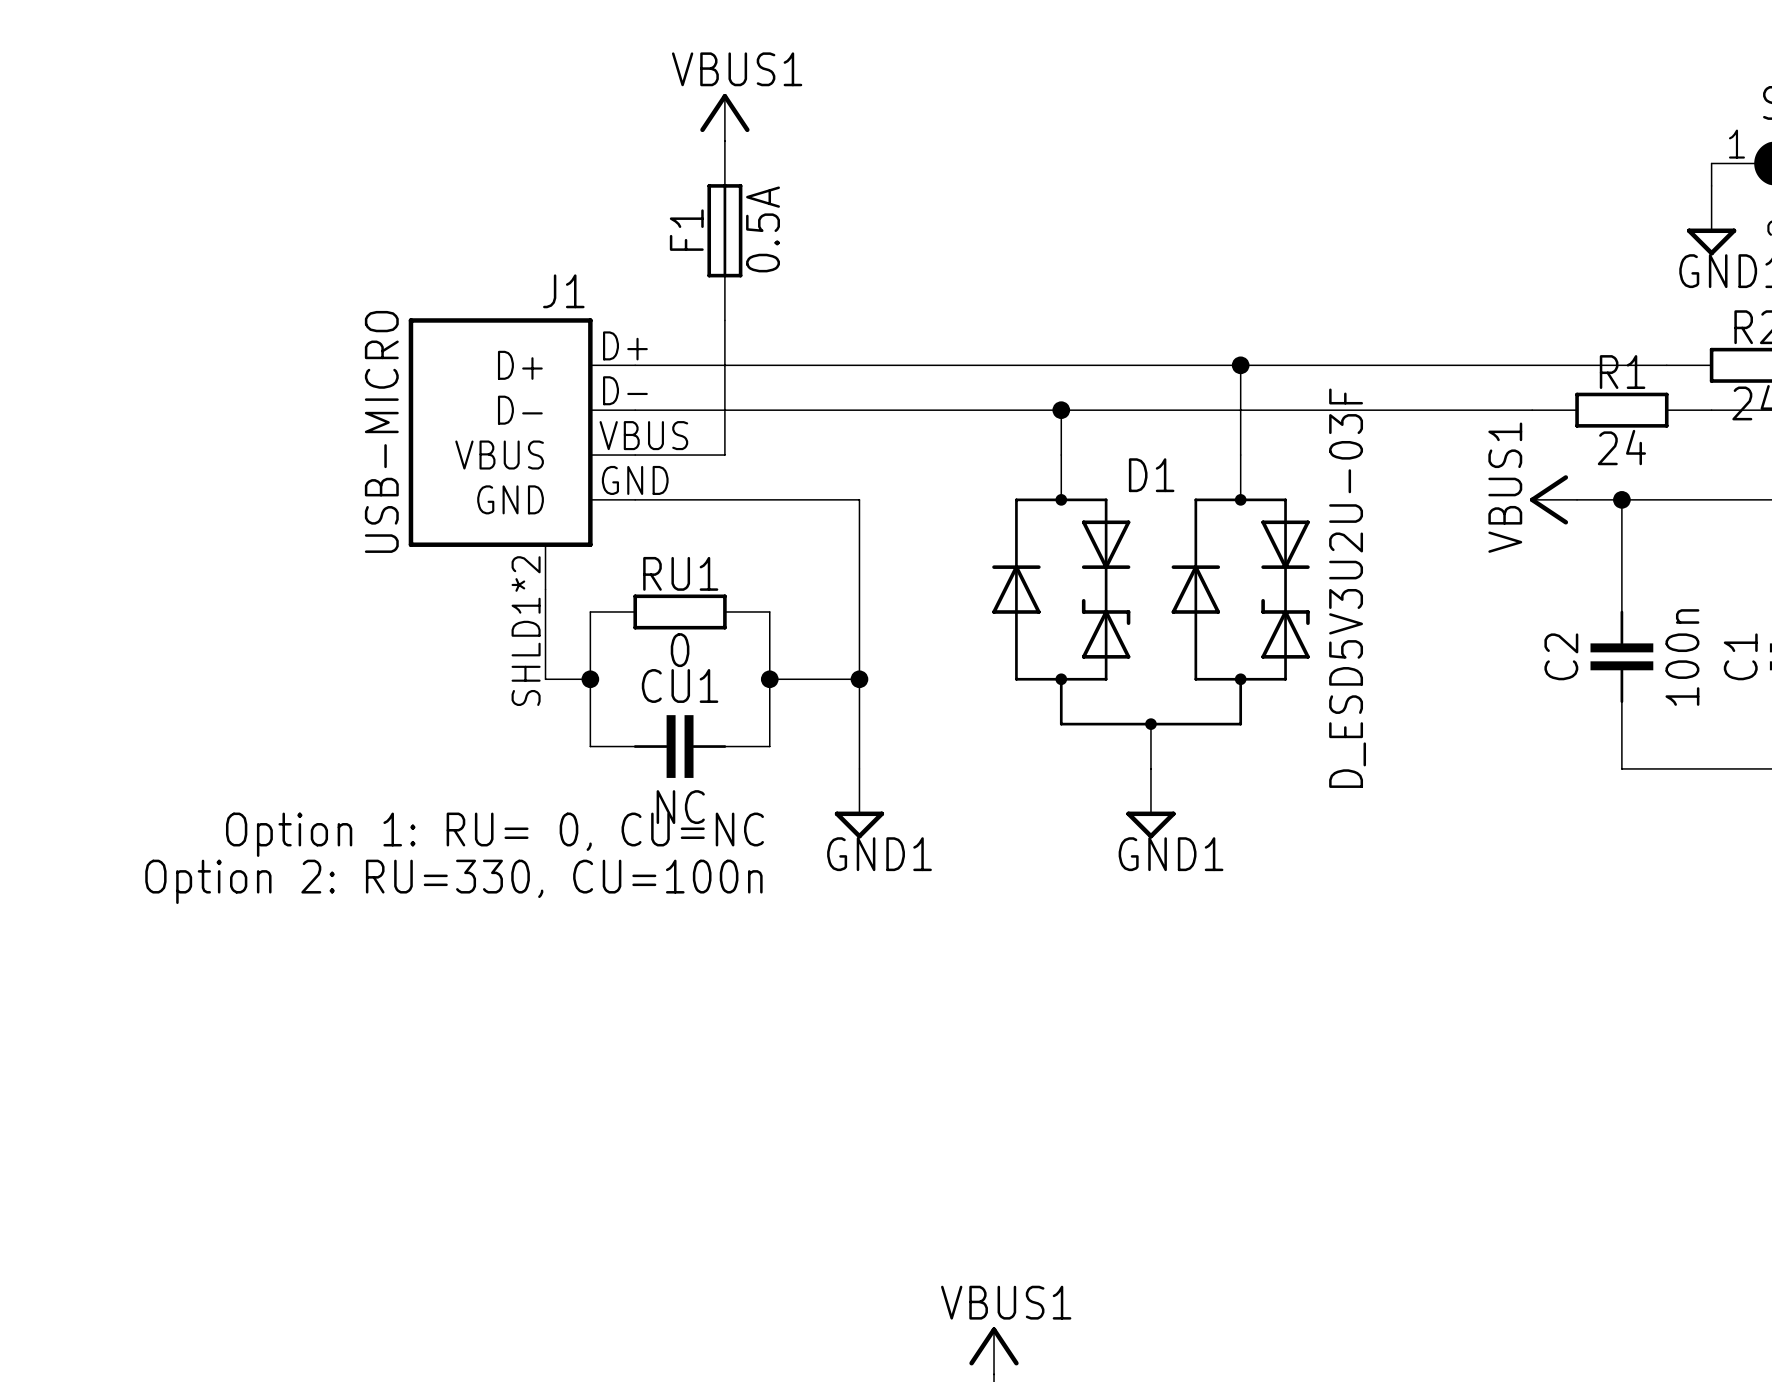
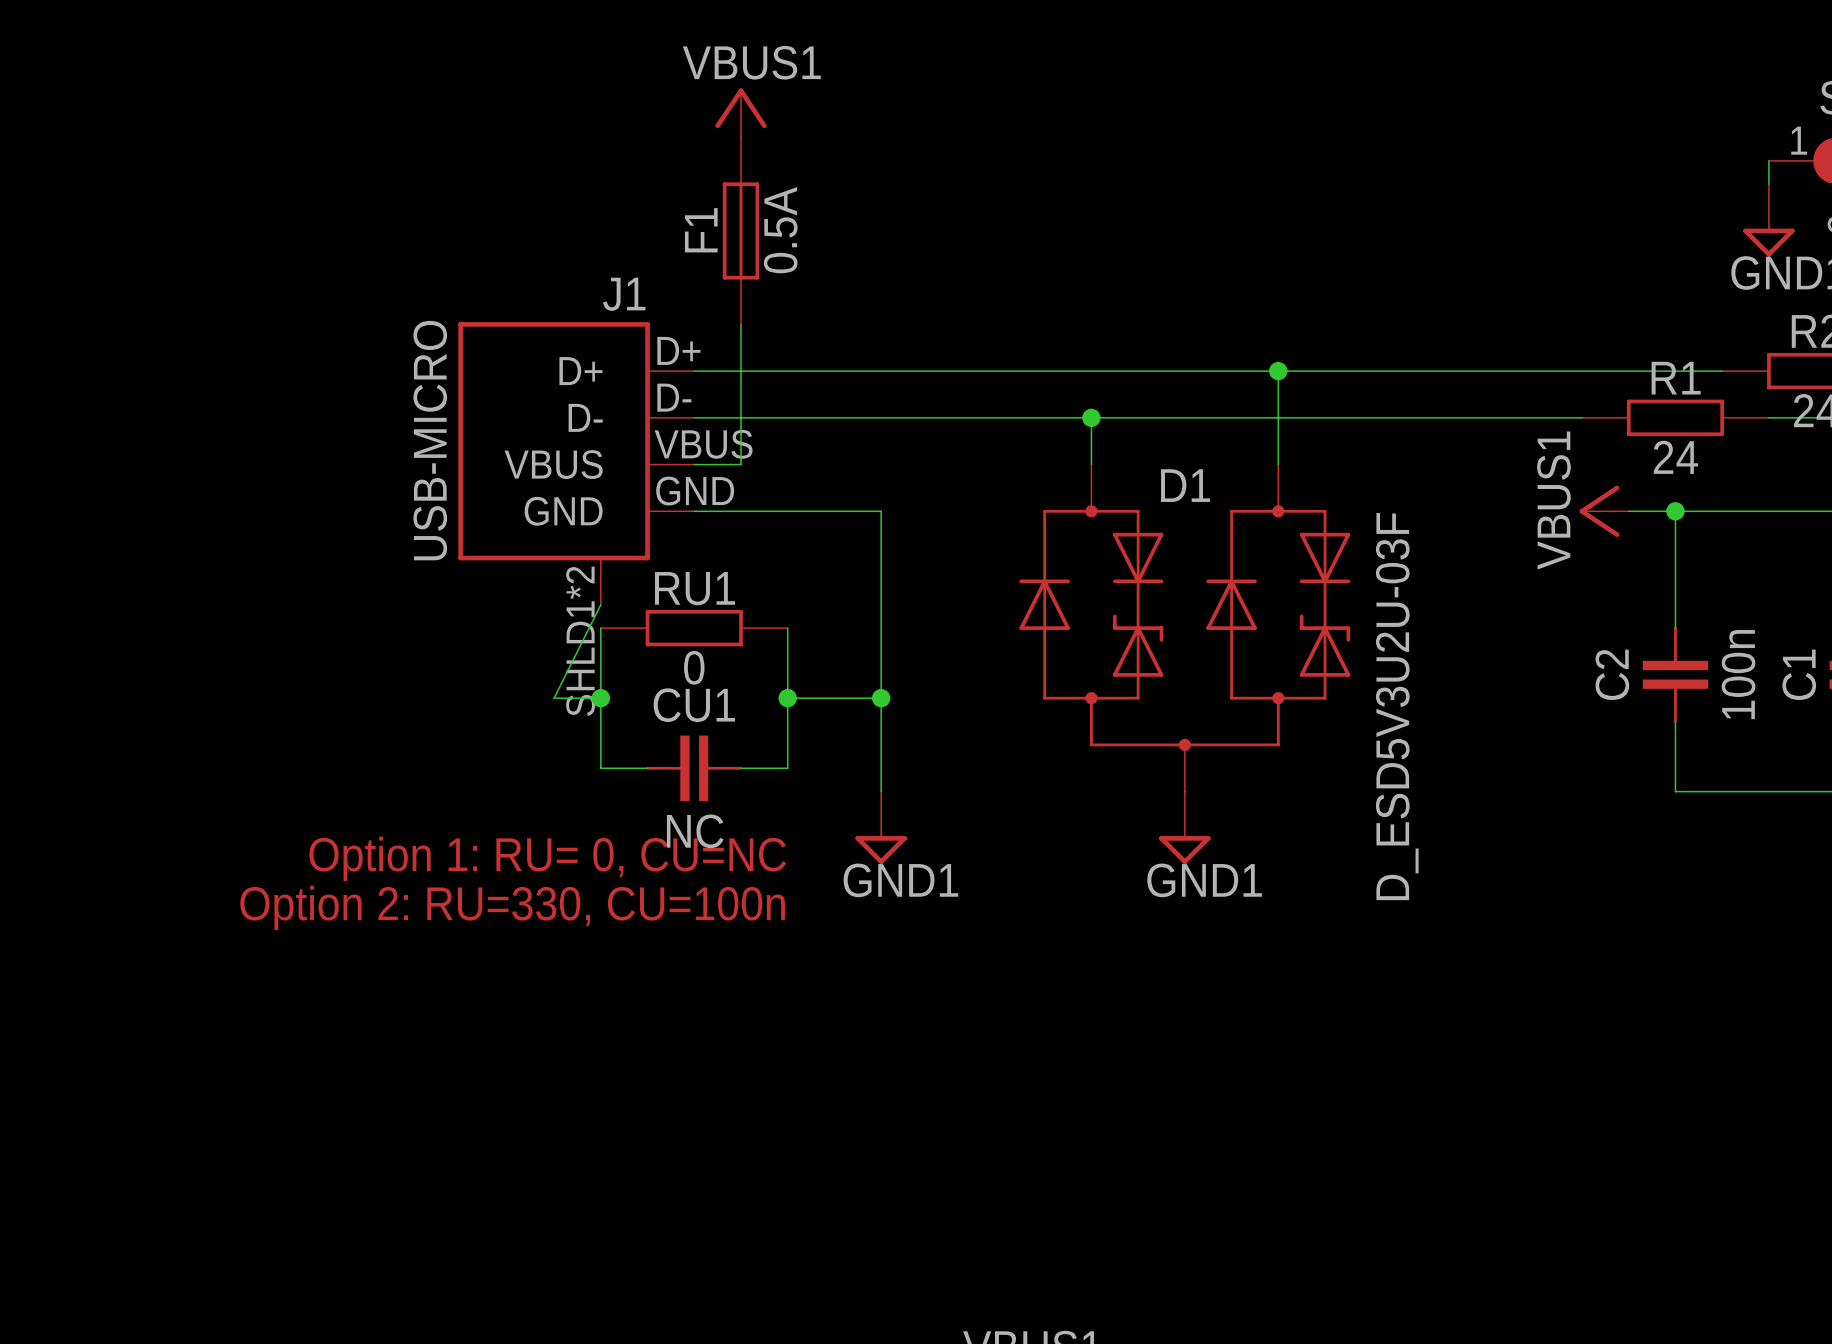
J1 position: (521, 453) -> (576, 463)
D1 value position: D_ESD5V3U2U-03F (1347, 588) -> D_ESD5V3U2U-03F (1397, 706)
wire: (545, 589) (545, 679) -> (600, 604) (554, 698)

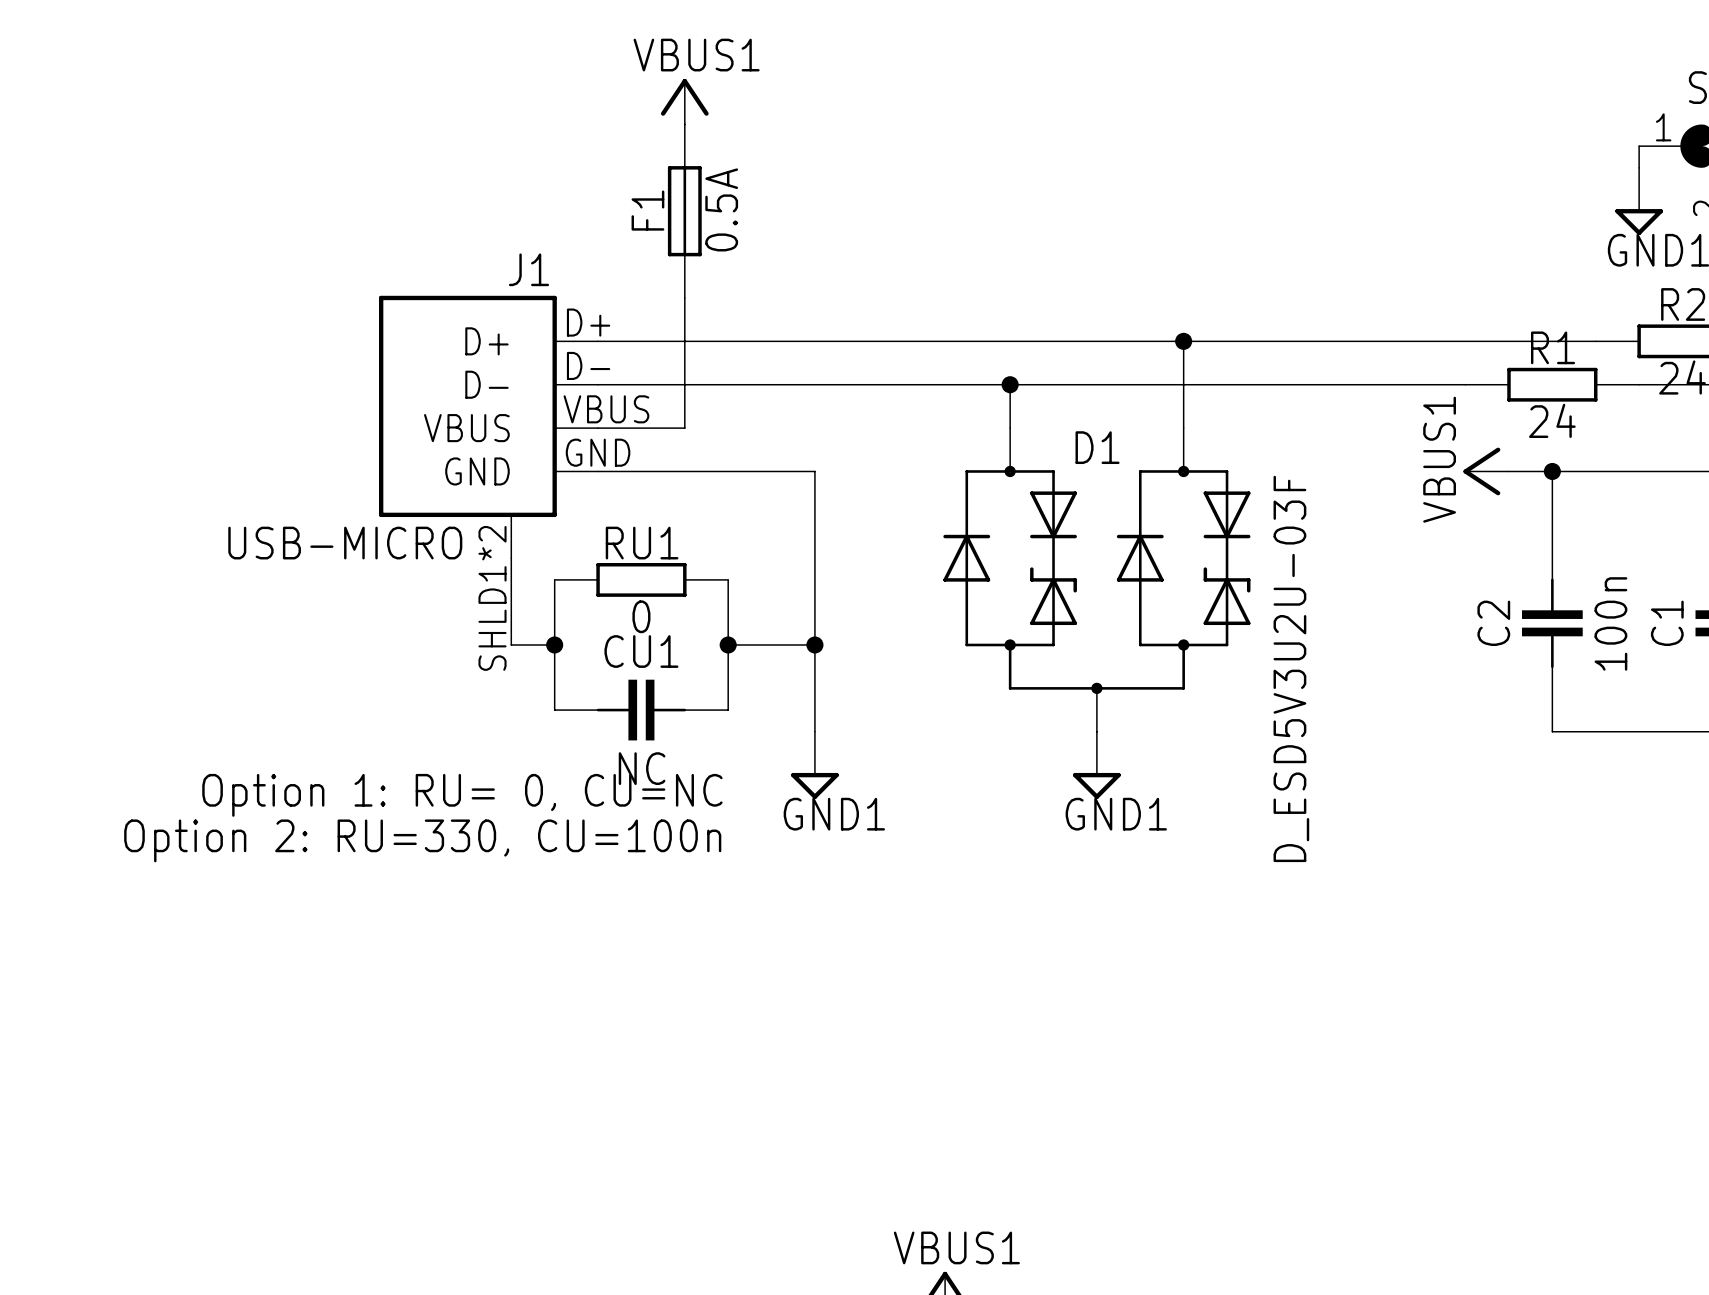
J1 value rotation: 0° (430, 440) -> 90° clockwise (345, 543)
J1 position: (576, 463) -> (488, 427)
wire: (600, 604) (554, 698) -> (511, 558) (511, 644)

